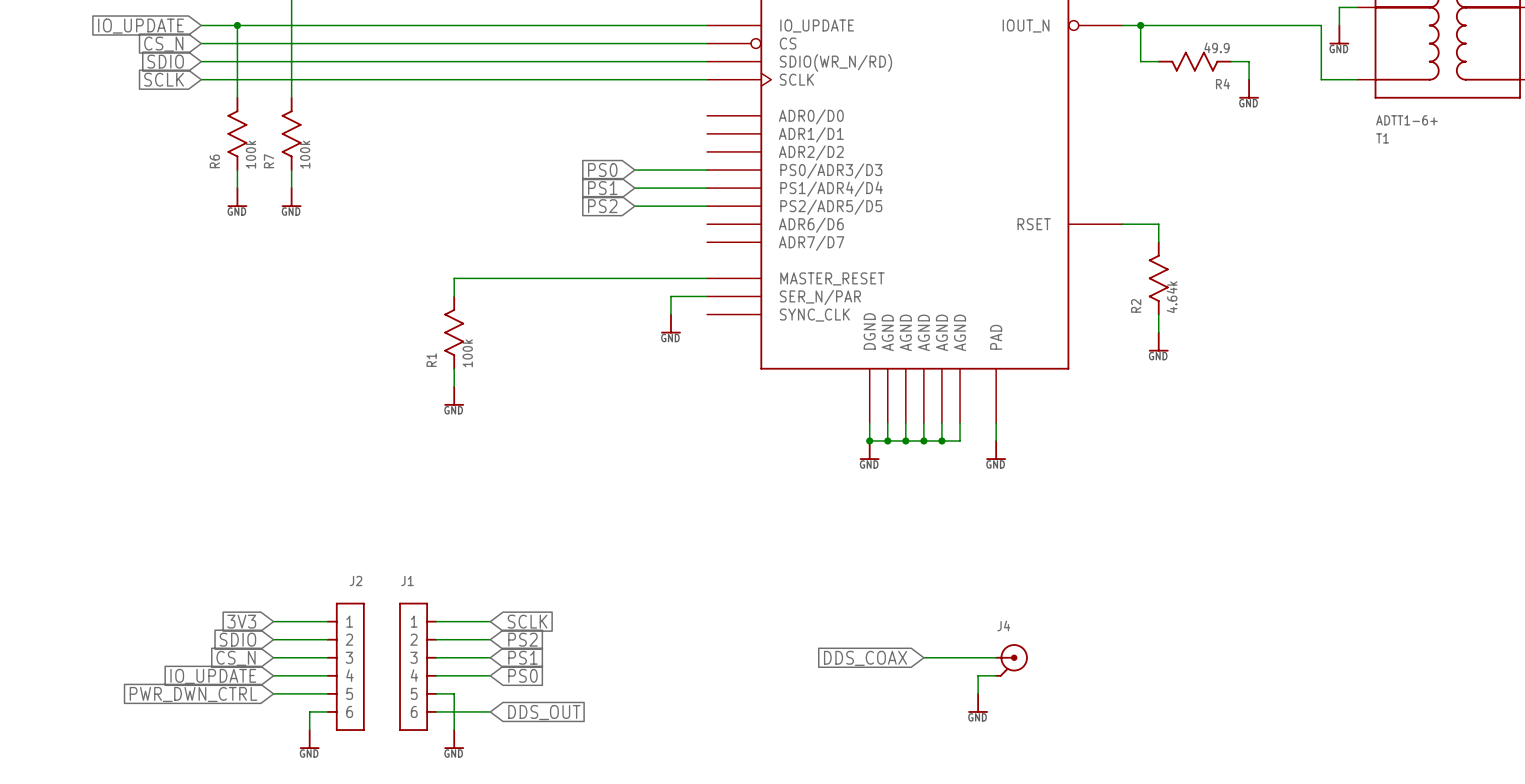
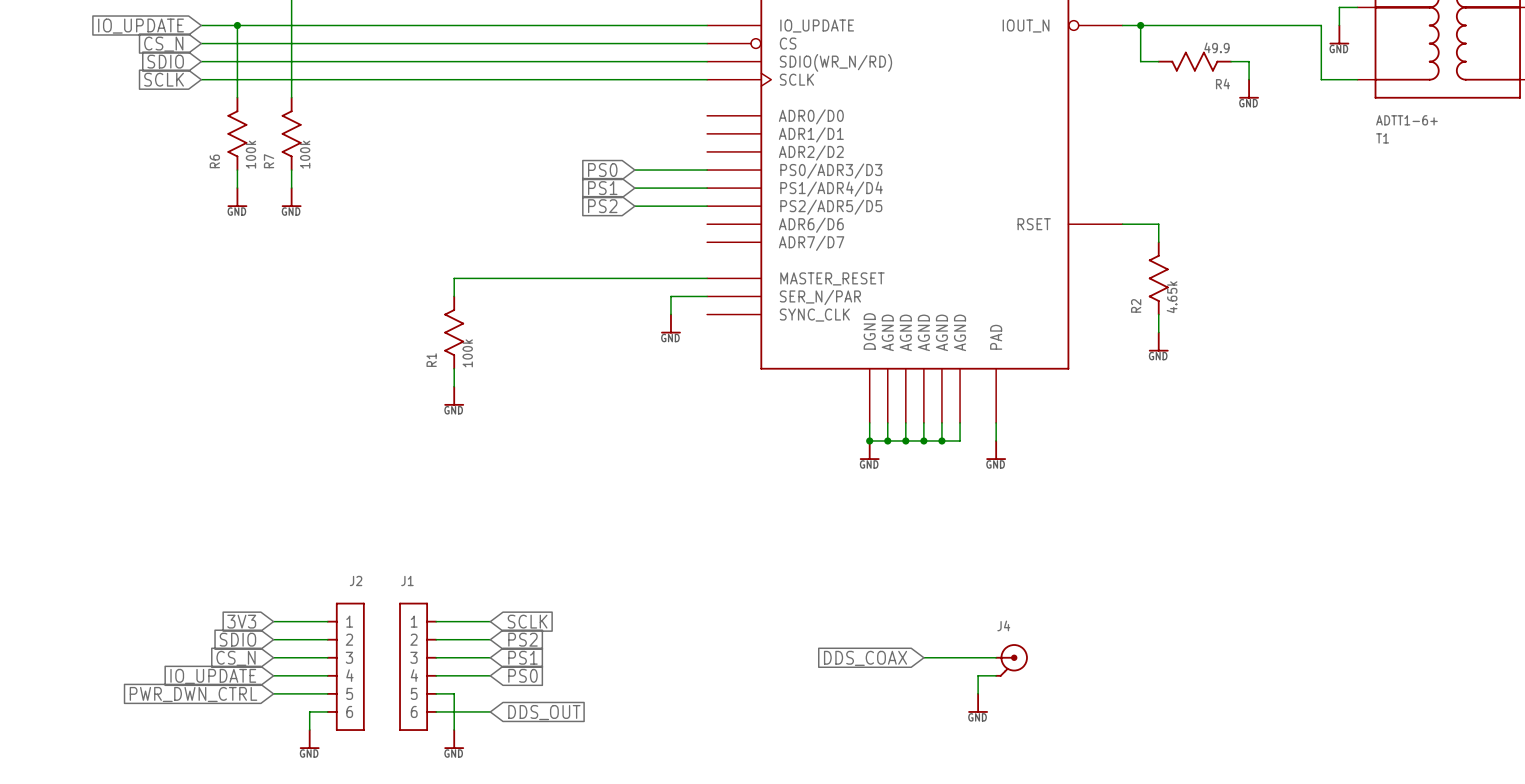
R2 value: 4.64k (1172, 297) -> 4.65k (1172, 297)

